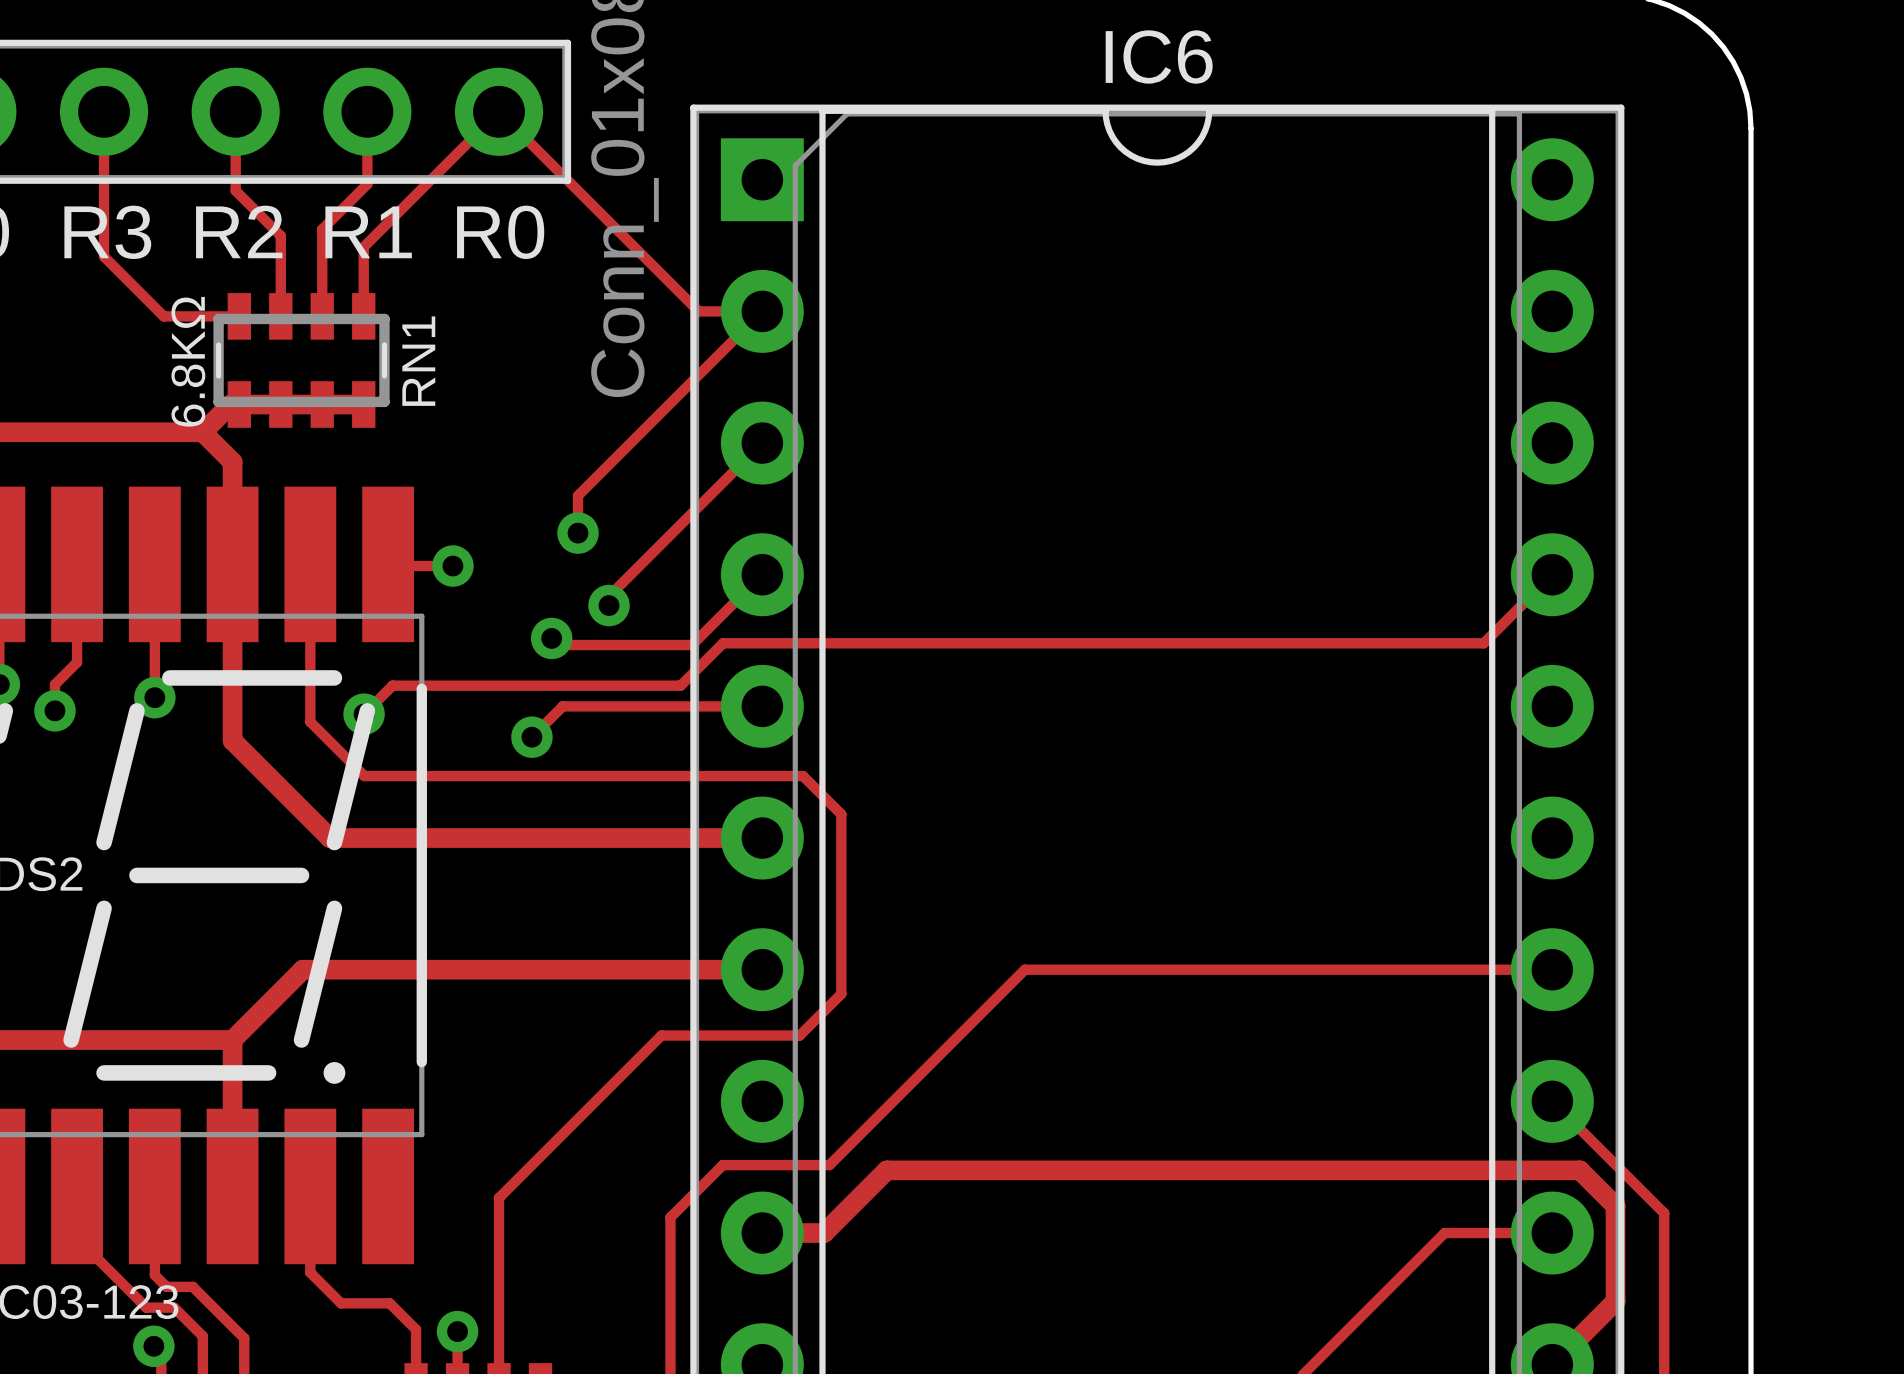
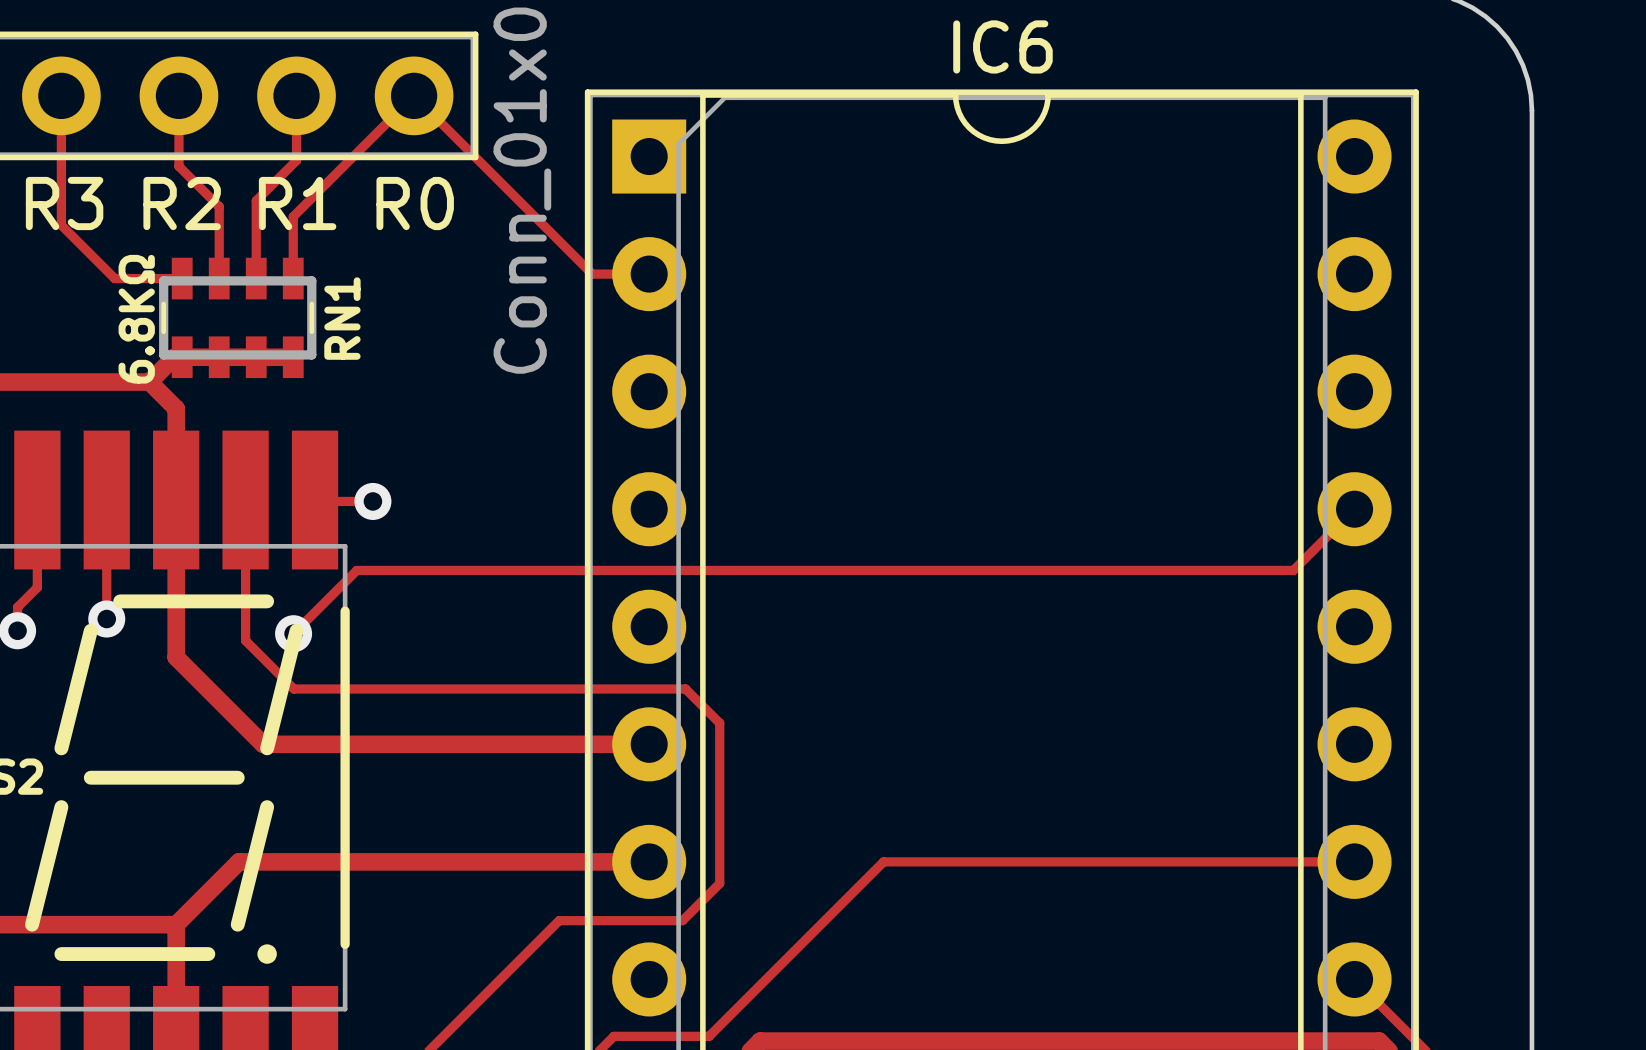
track: (762, 311) (578, 495) (578, 533) -> none
track: (762, 443) (609, 596) (609, 605) -> none
via: (578, 533) -> none
track: (762, 574) (692, 645) (558, 645) (551, 638) -> none
via: (609, 605) -> none
via: (551, 638) -> none
track: (723, 643) (680, 685) (392, 685) -> (614, 570) (356, 570) (319, 608)
track: (762, 706) (562, 706) (531, 737) -> none
via: (531, 737) -> none

